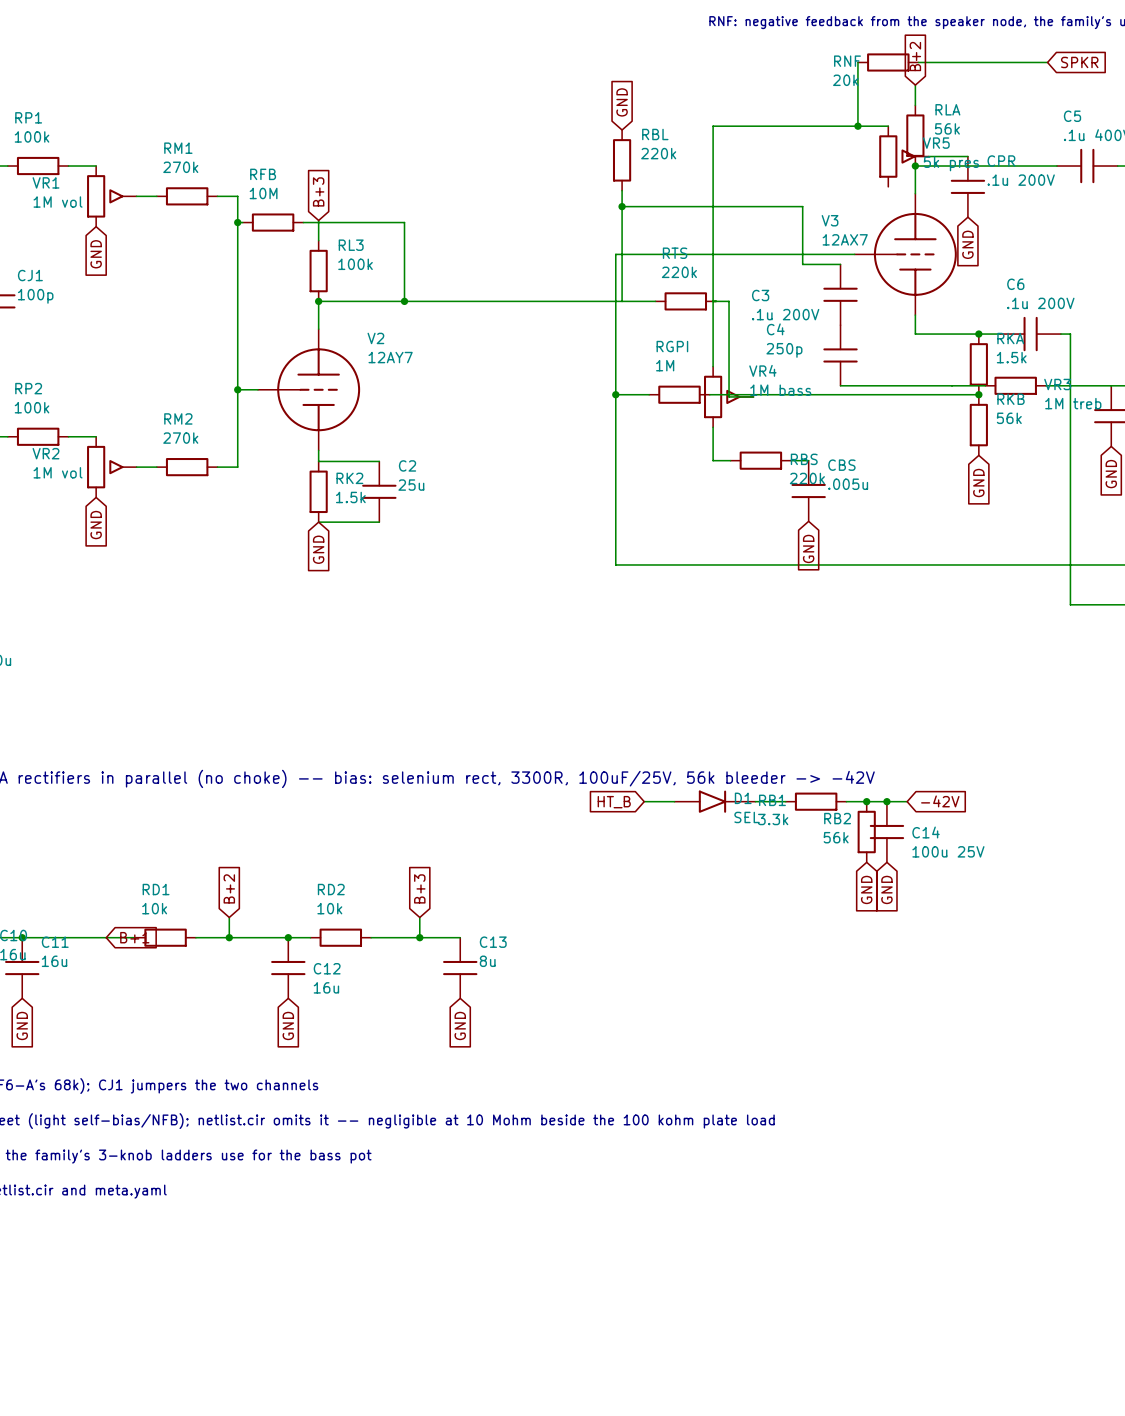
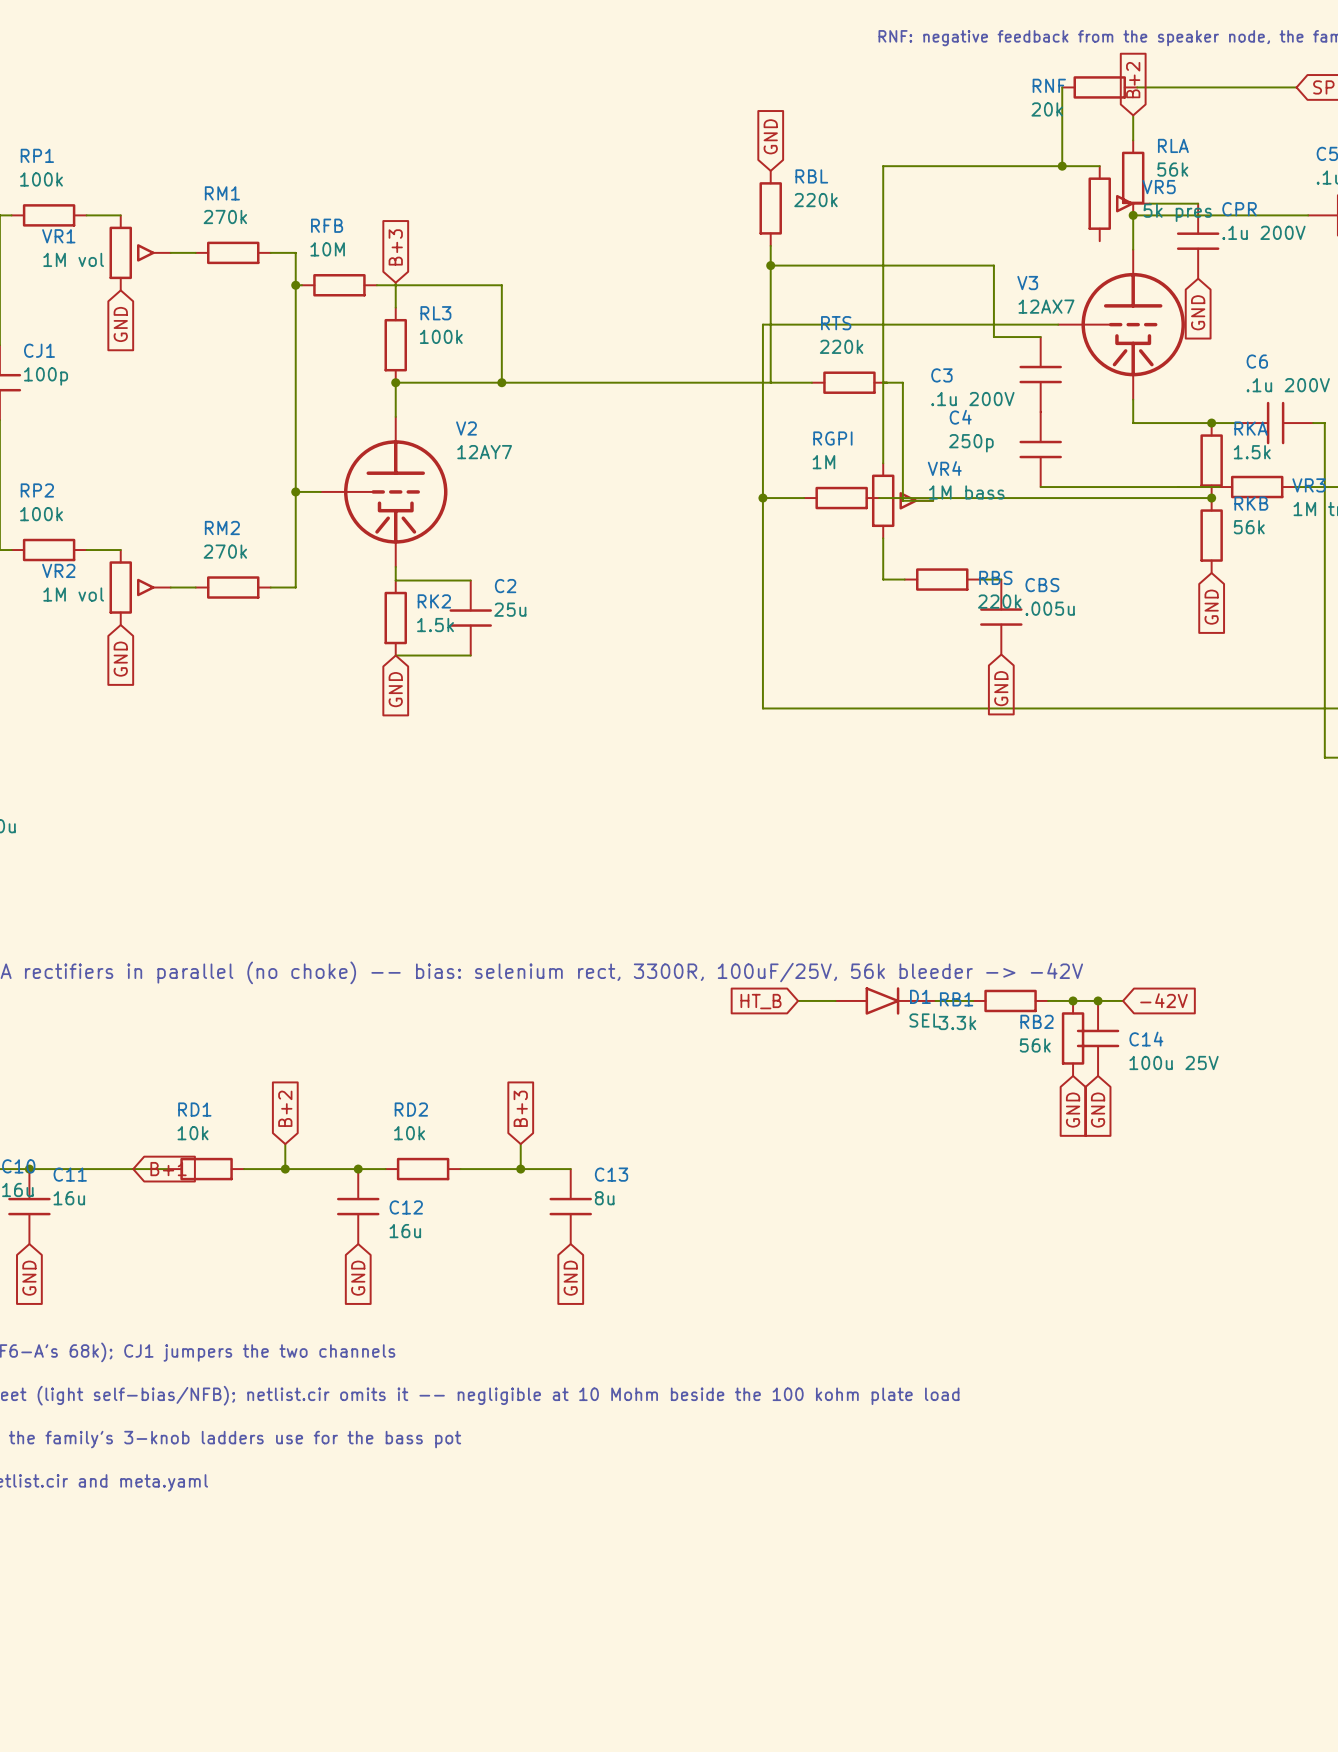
V3 symbol: [854, 193, 957, 316] -> [1058, 249, 1185, 400]
V2 symbol: [257, 329, 361, 451] -> [320, 416, 448, 567]

